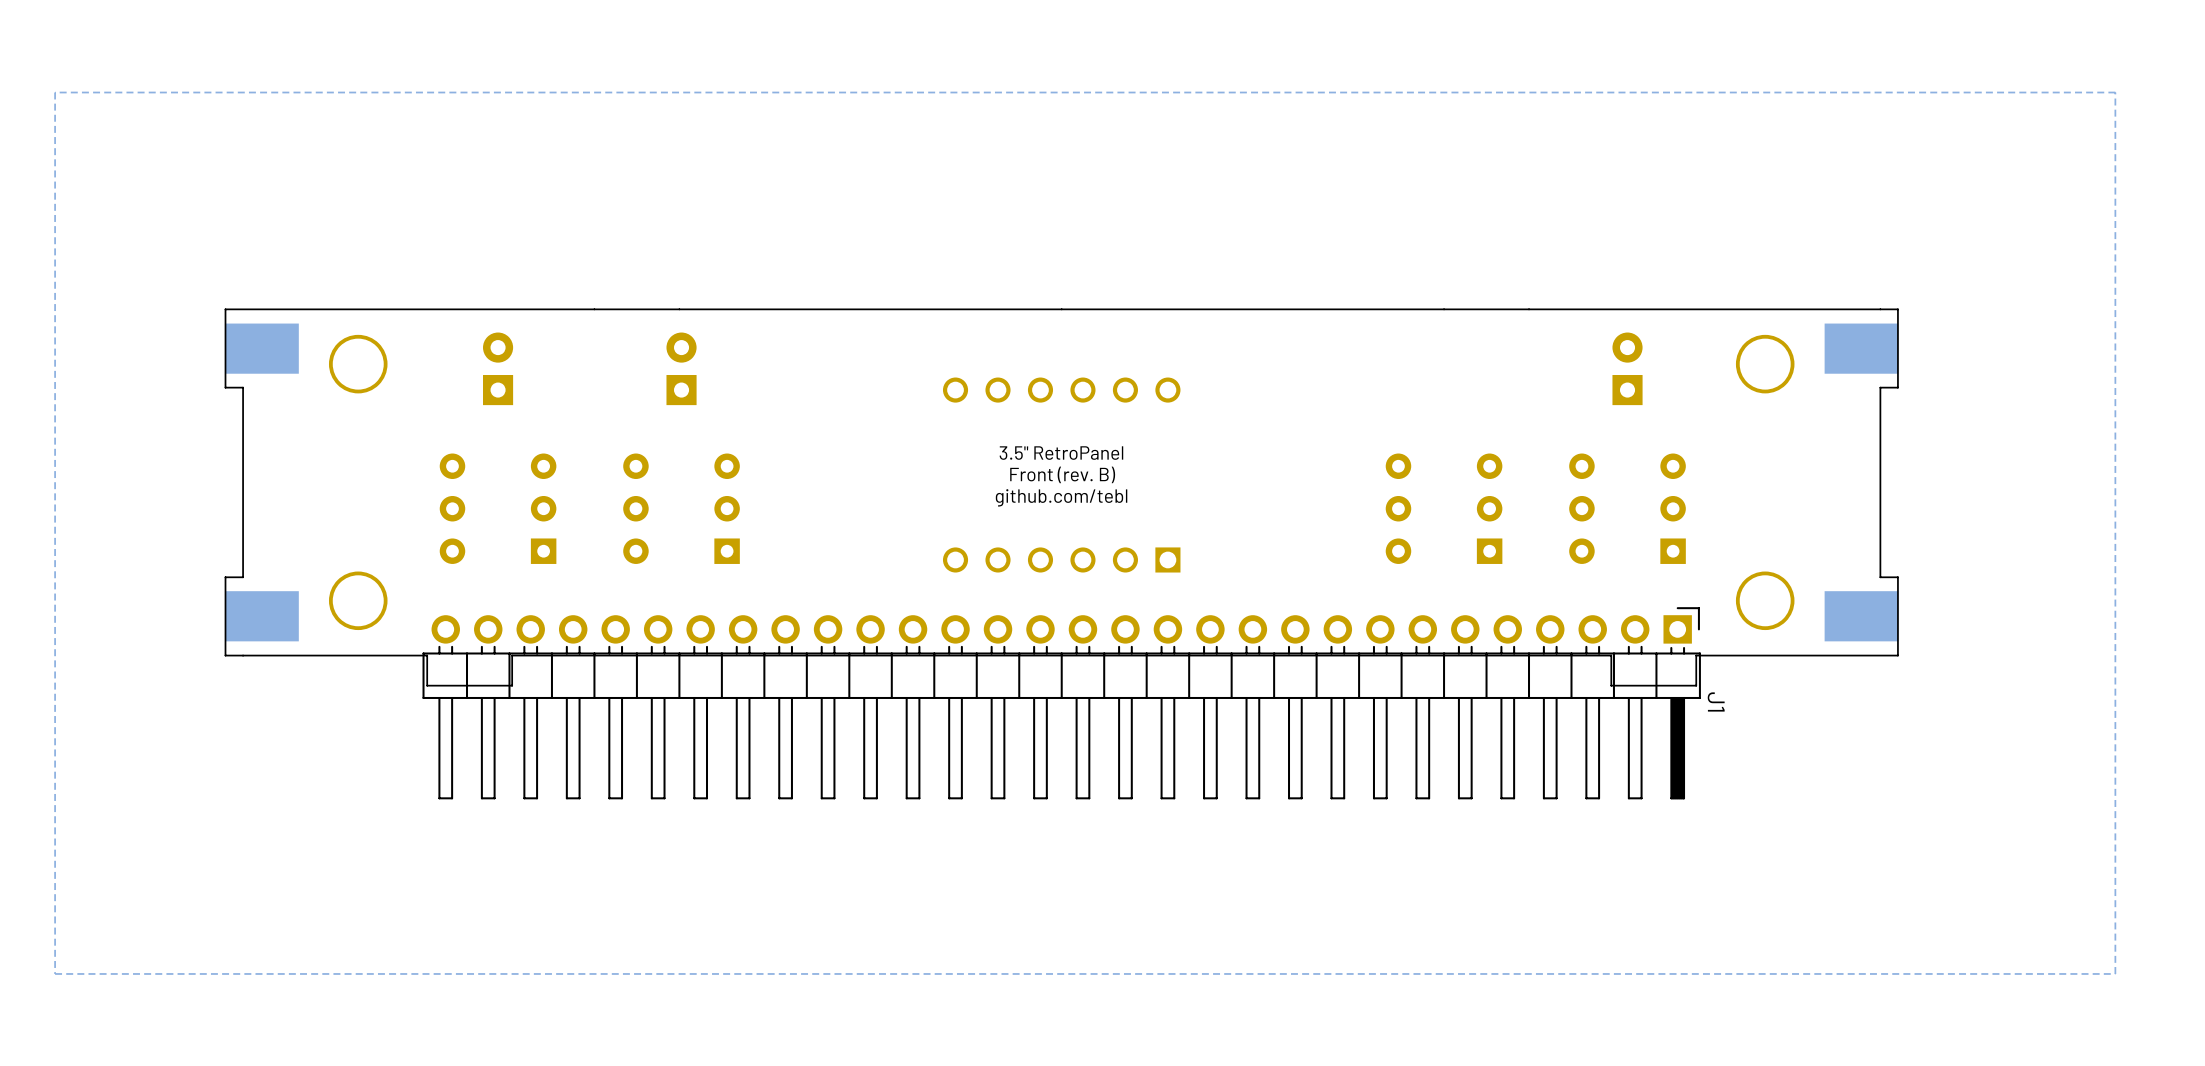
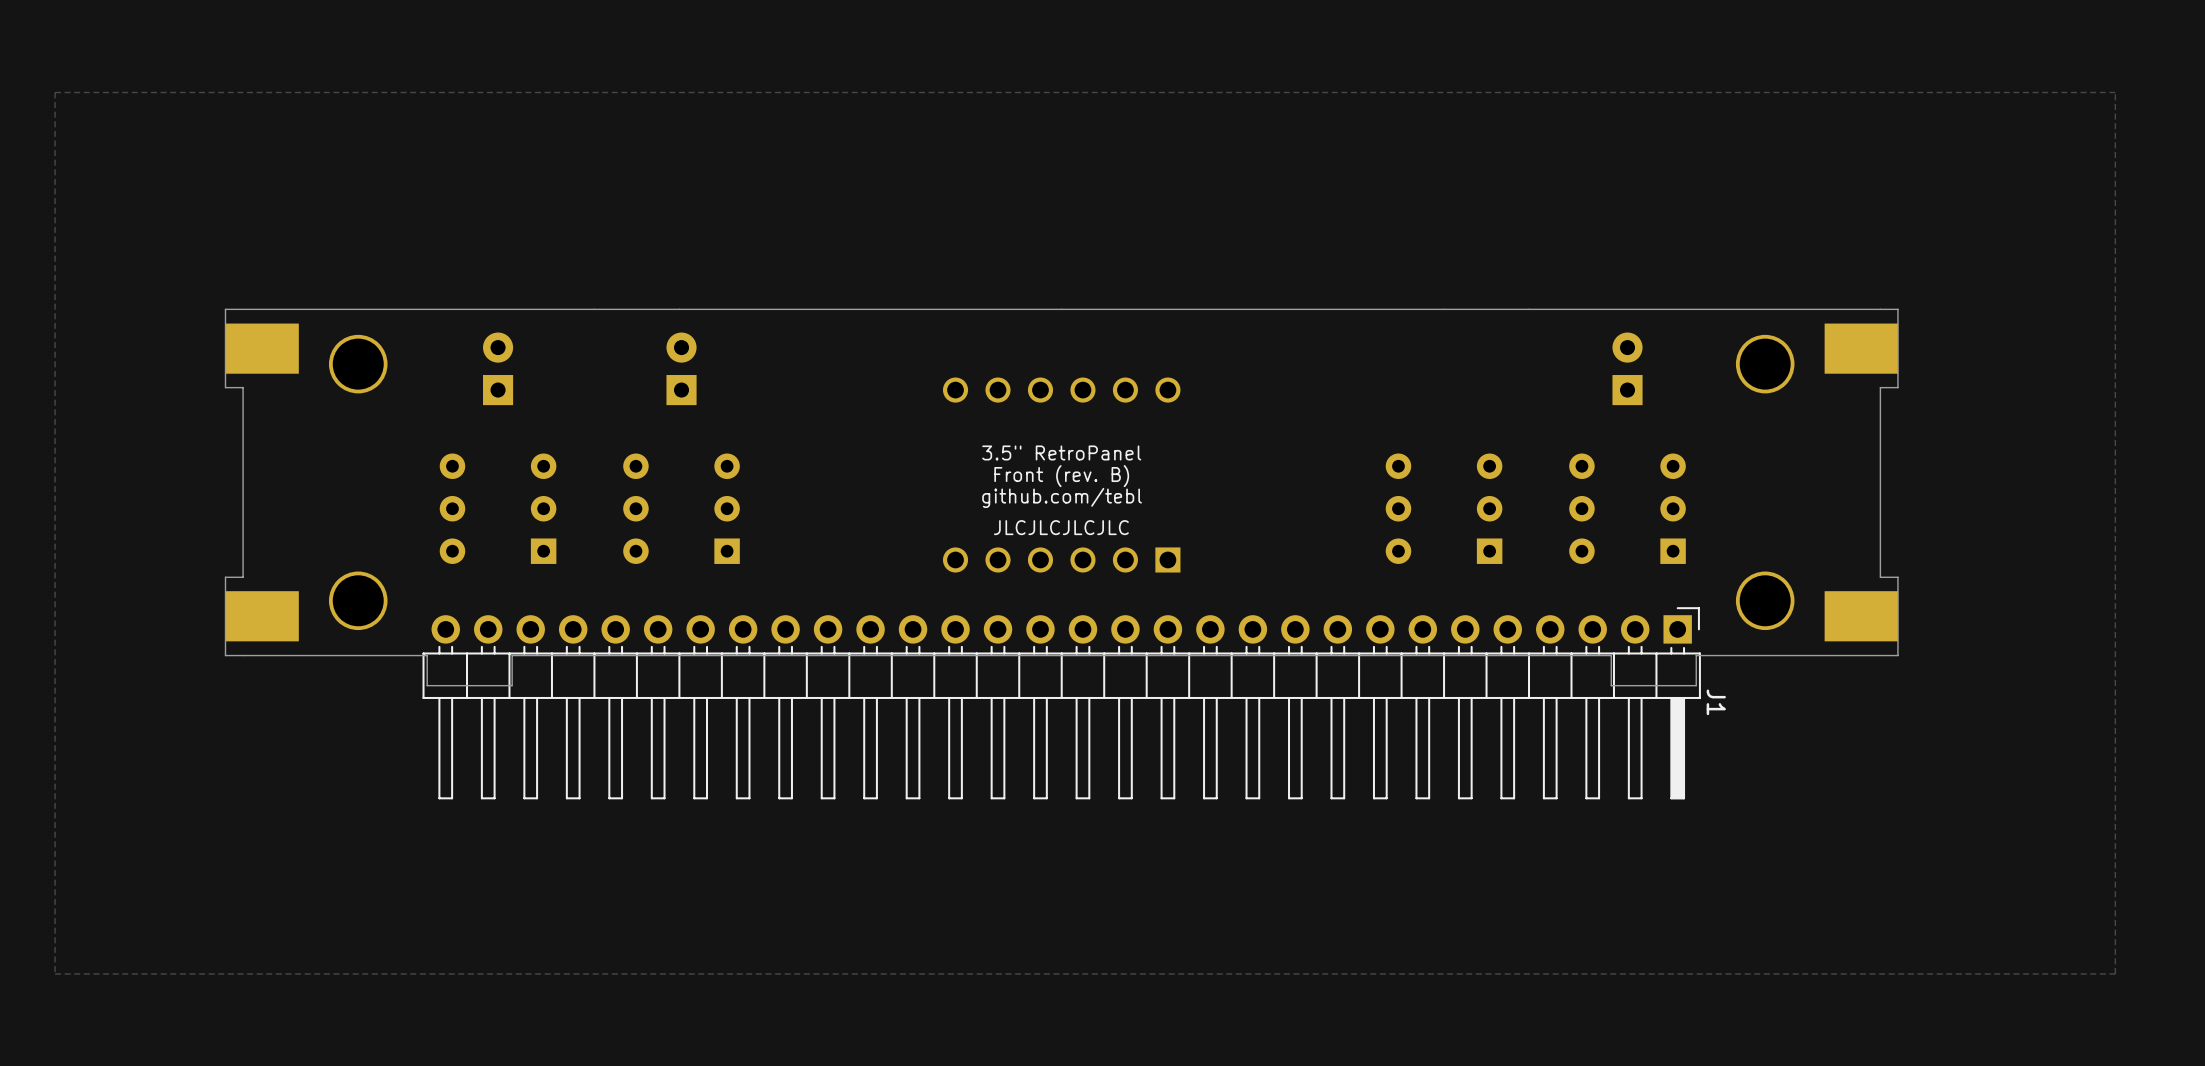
text: none -> JLCJLCJLCJLC (1061, 527)

